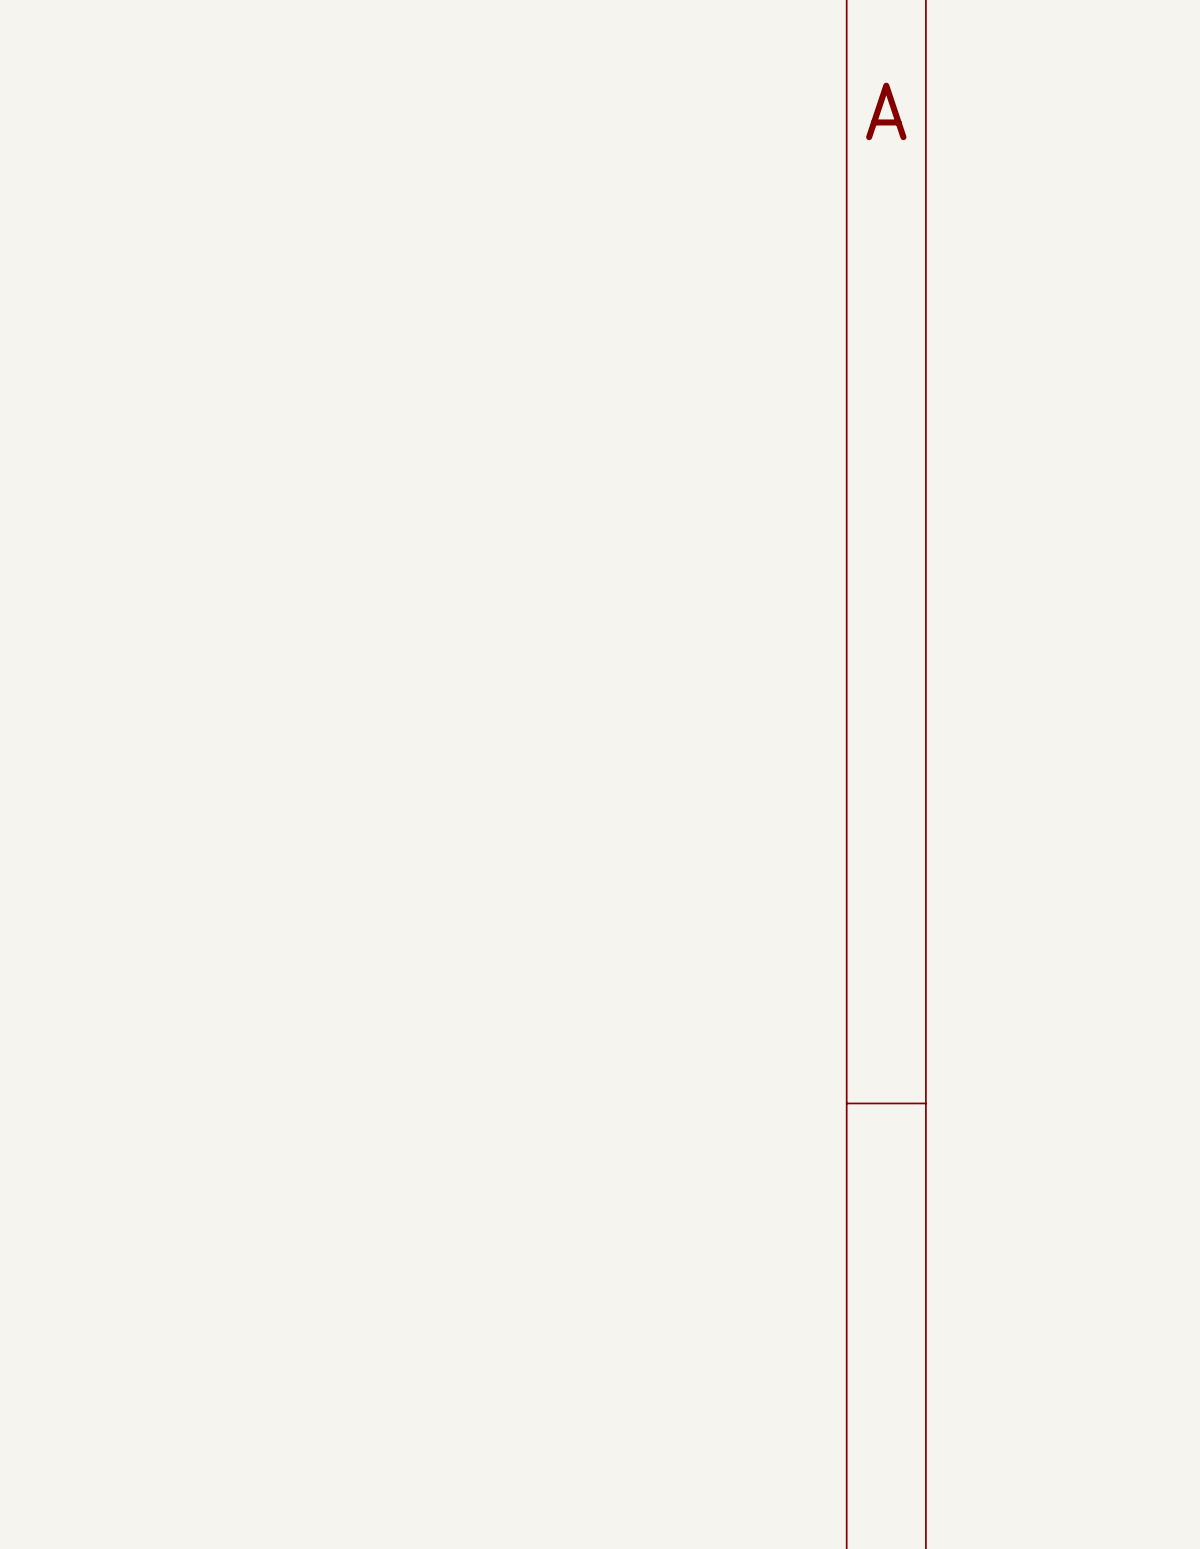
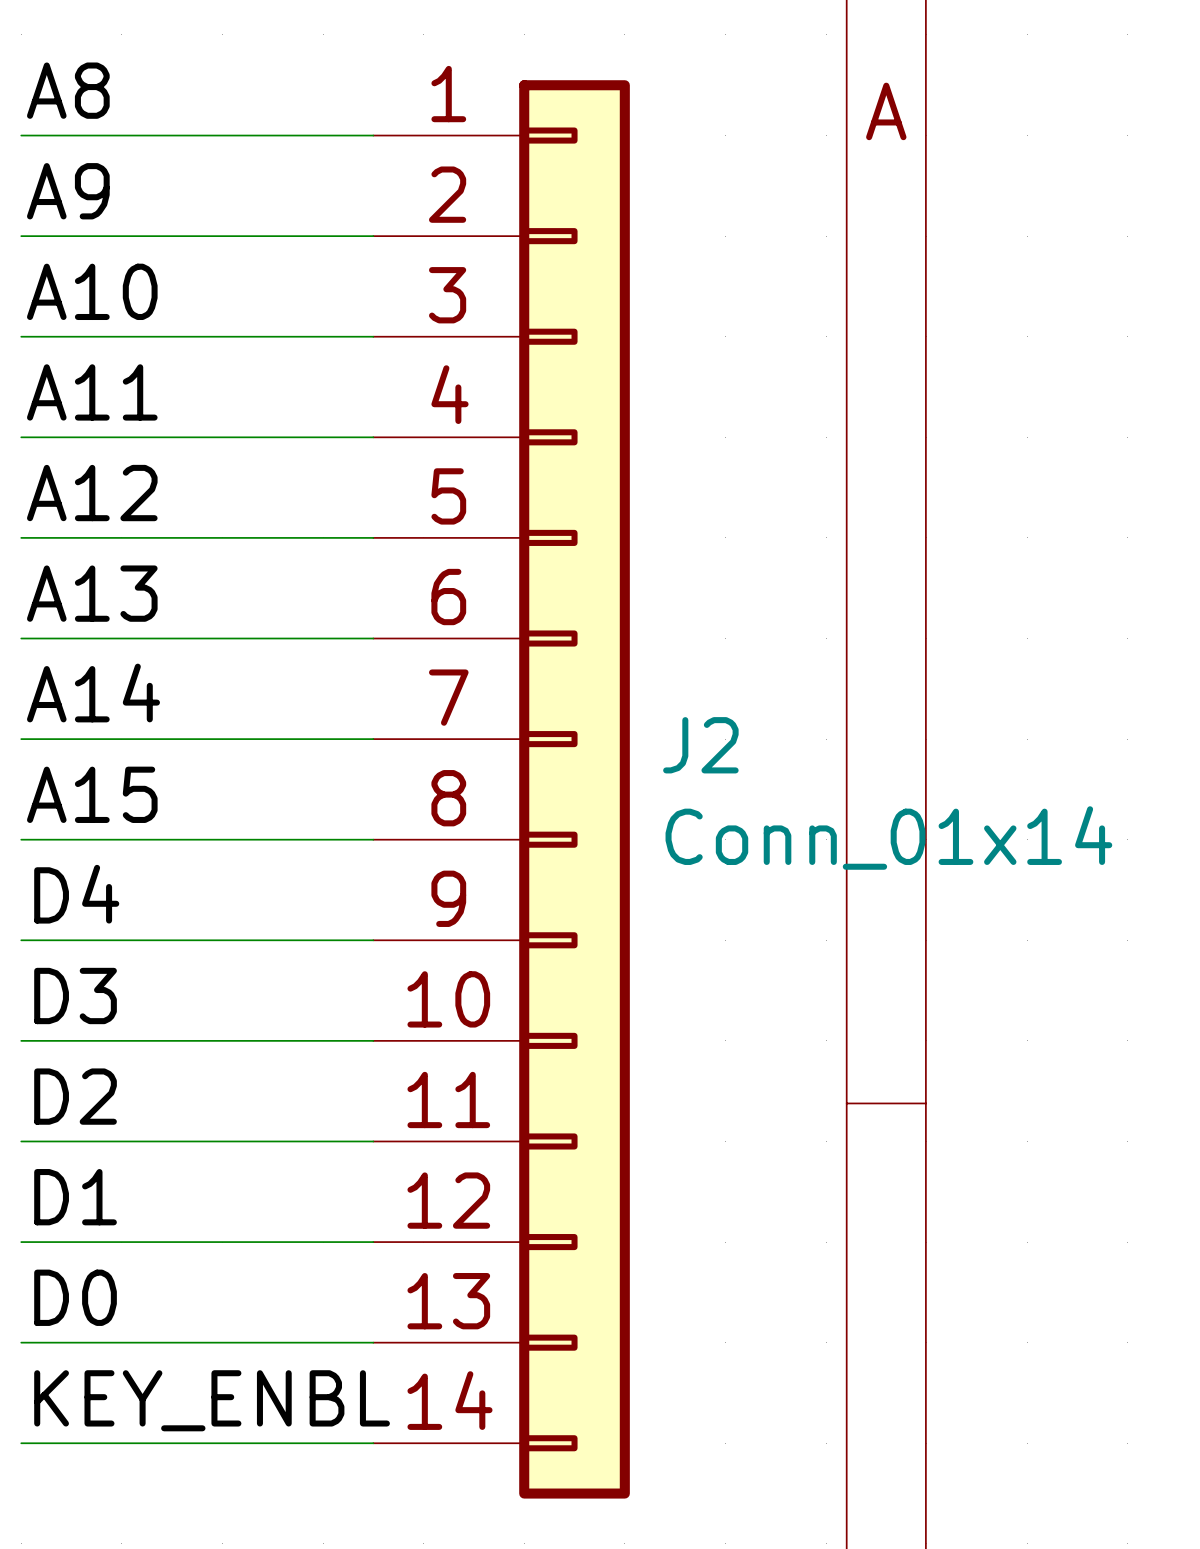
label: none -> A8 (68, 90)
wire: none -> (21, 135) (373, 135)
label: none -> A9 (68, 191)
wire: none -> (21, 236) (373, 236)
label: none -> A10 (92, 291)
wire: none -> (21, 336) (373, 336)
label: none -> A11 (92, 392)
wire: none -> (21, 437) (373, 437)
label: none -> A12 (92, 493)
wire: none -> (21, 537) (373, 537)
label: none -> A13 (92, 593)
wire: none -> (21, 638) (373, 638)
label: none -> A14 (93, 693)
wire: none -> (21, 739) (373, 739)
J2: none -> Conn_01x14 (501, 789)
label: none -> A15 (92, 794)
wire: none -> (21, 839) (373, 839)
label: none -> D4 (76, 894)
wire: none -> (21, 940) (373, 940)
label: none -> D3 (75, 995)
wire: none -> (21, 1040) (373, 1040)
label: none -> D2 (75, 1096)
wire: none -> (21, 1141) (373, 1141)
label: none -> D1 (75, 1197)
wire: none -> (21, 1242) (373, 1242)
label: none -> D0 (75, 1297)
wire: none -> (21, 1342) (373, 1342)
label: none -> KEY_ENBL (212, 1400)
wire: none -> (21, 1443) (373, 1443)

